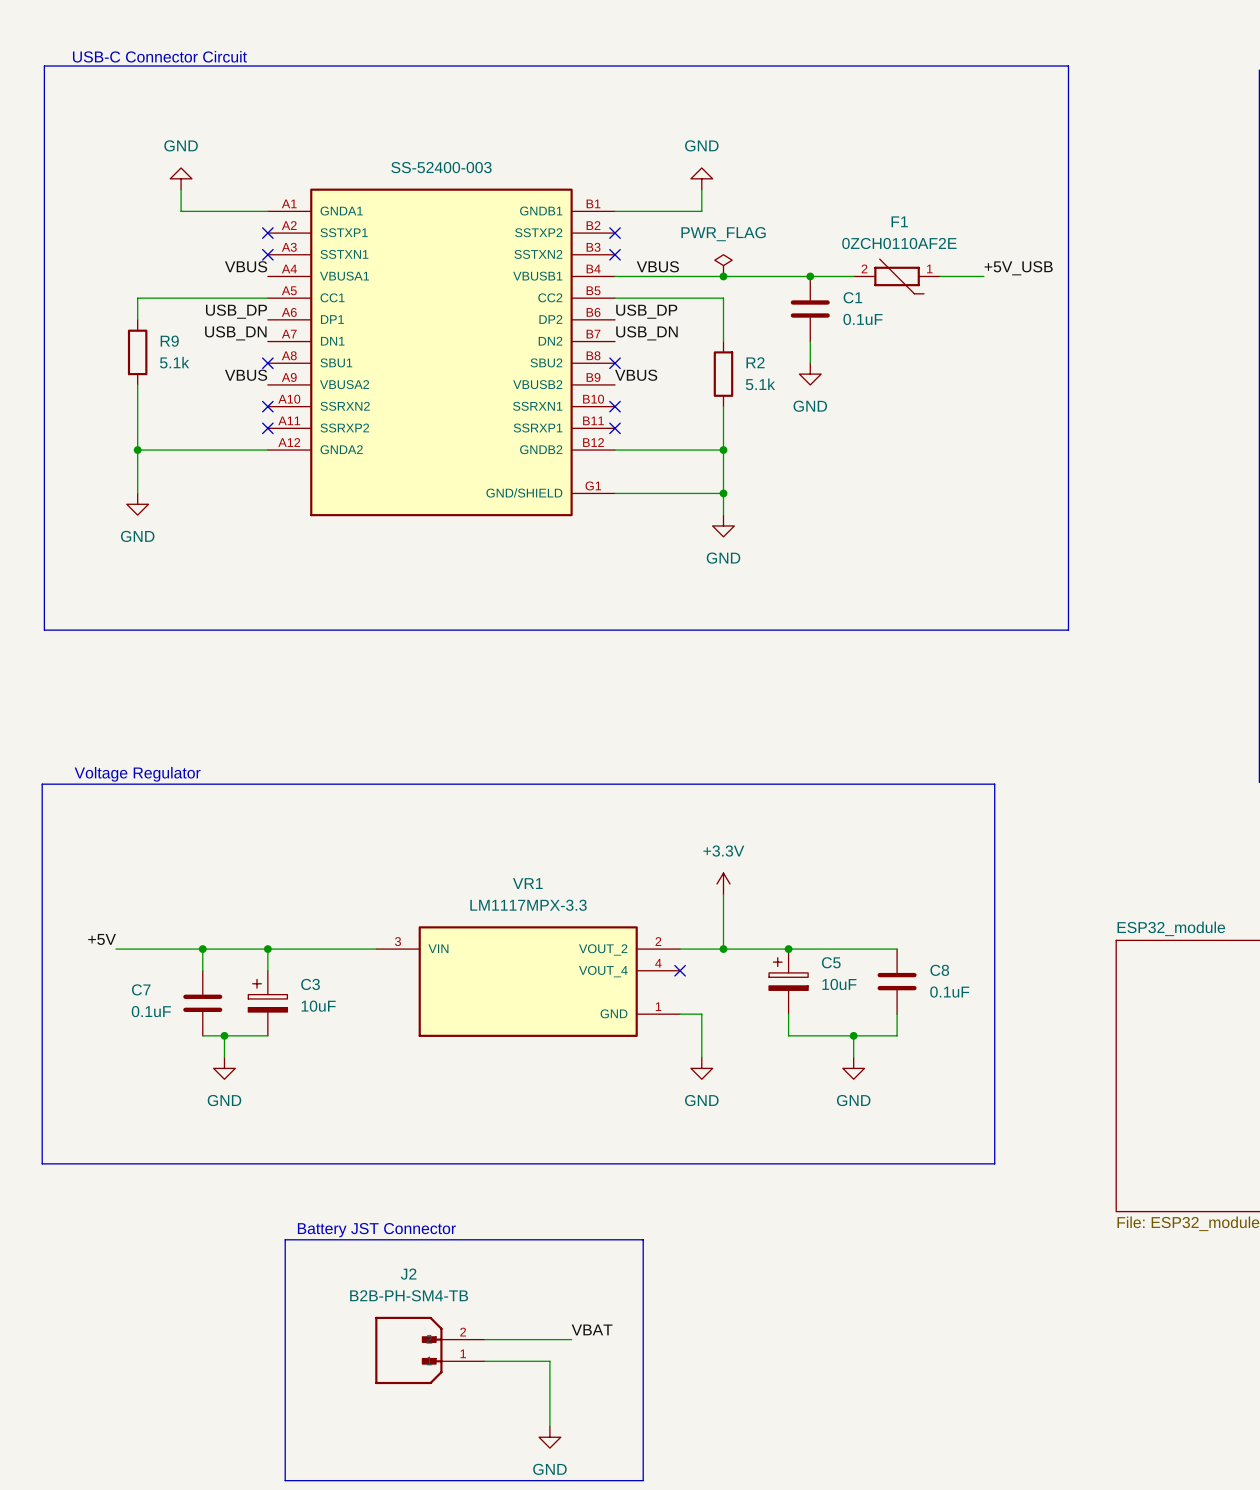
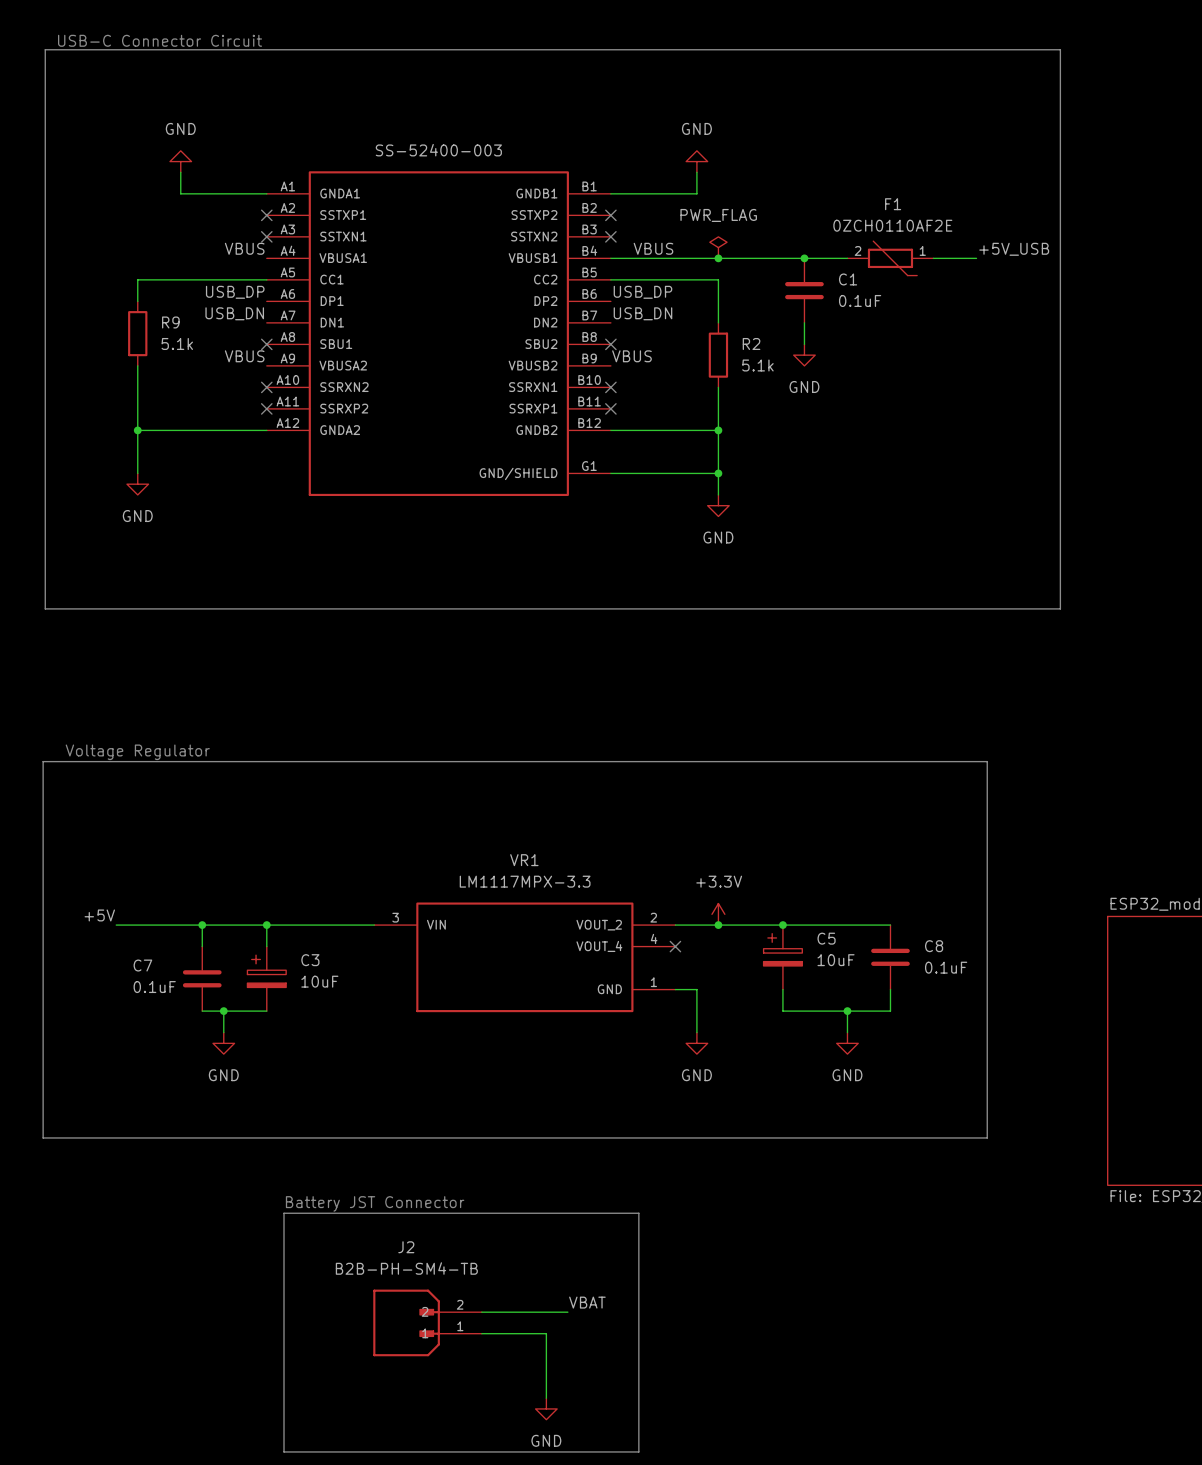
power symbol position: +3.3V (723, 883) -> +3.3V (718, 914)
wire: (723, 894) (723, 949) -> none

